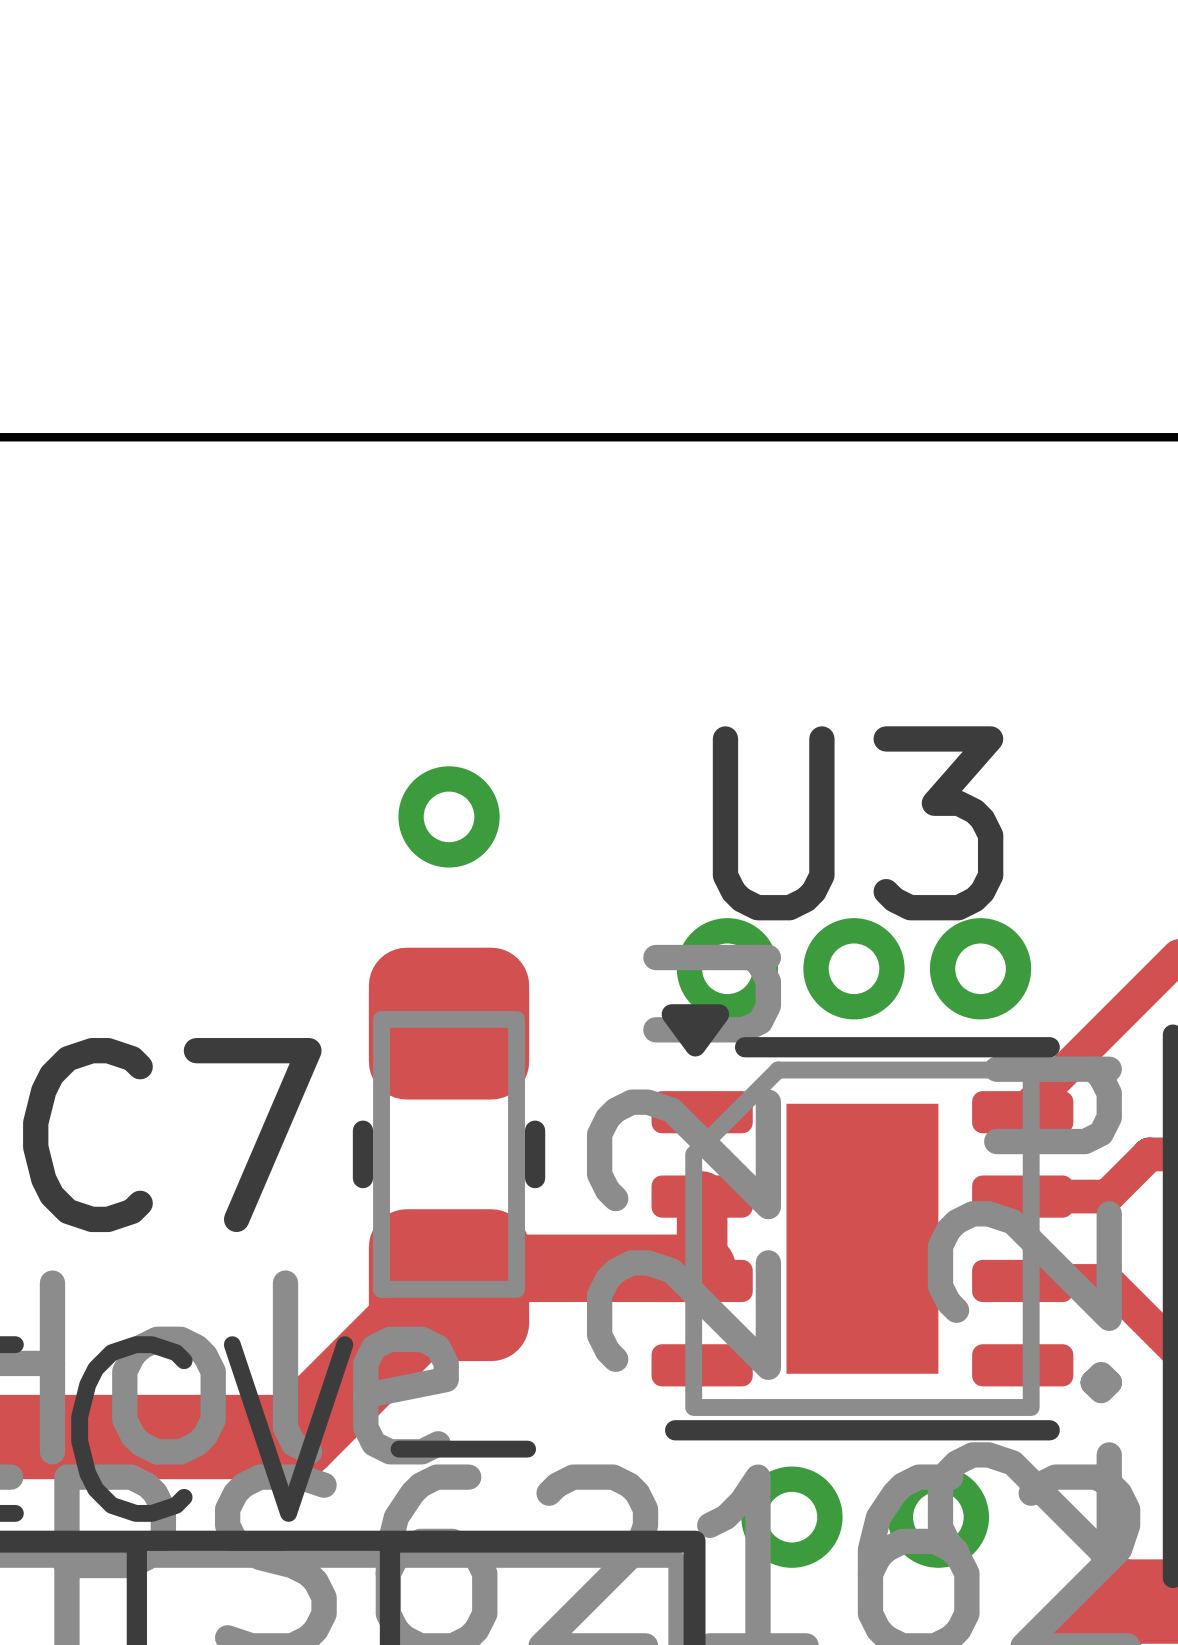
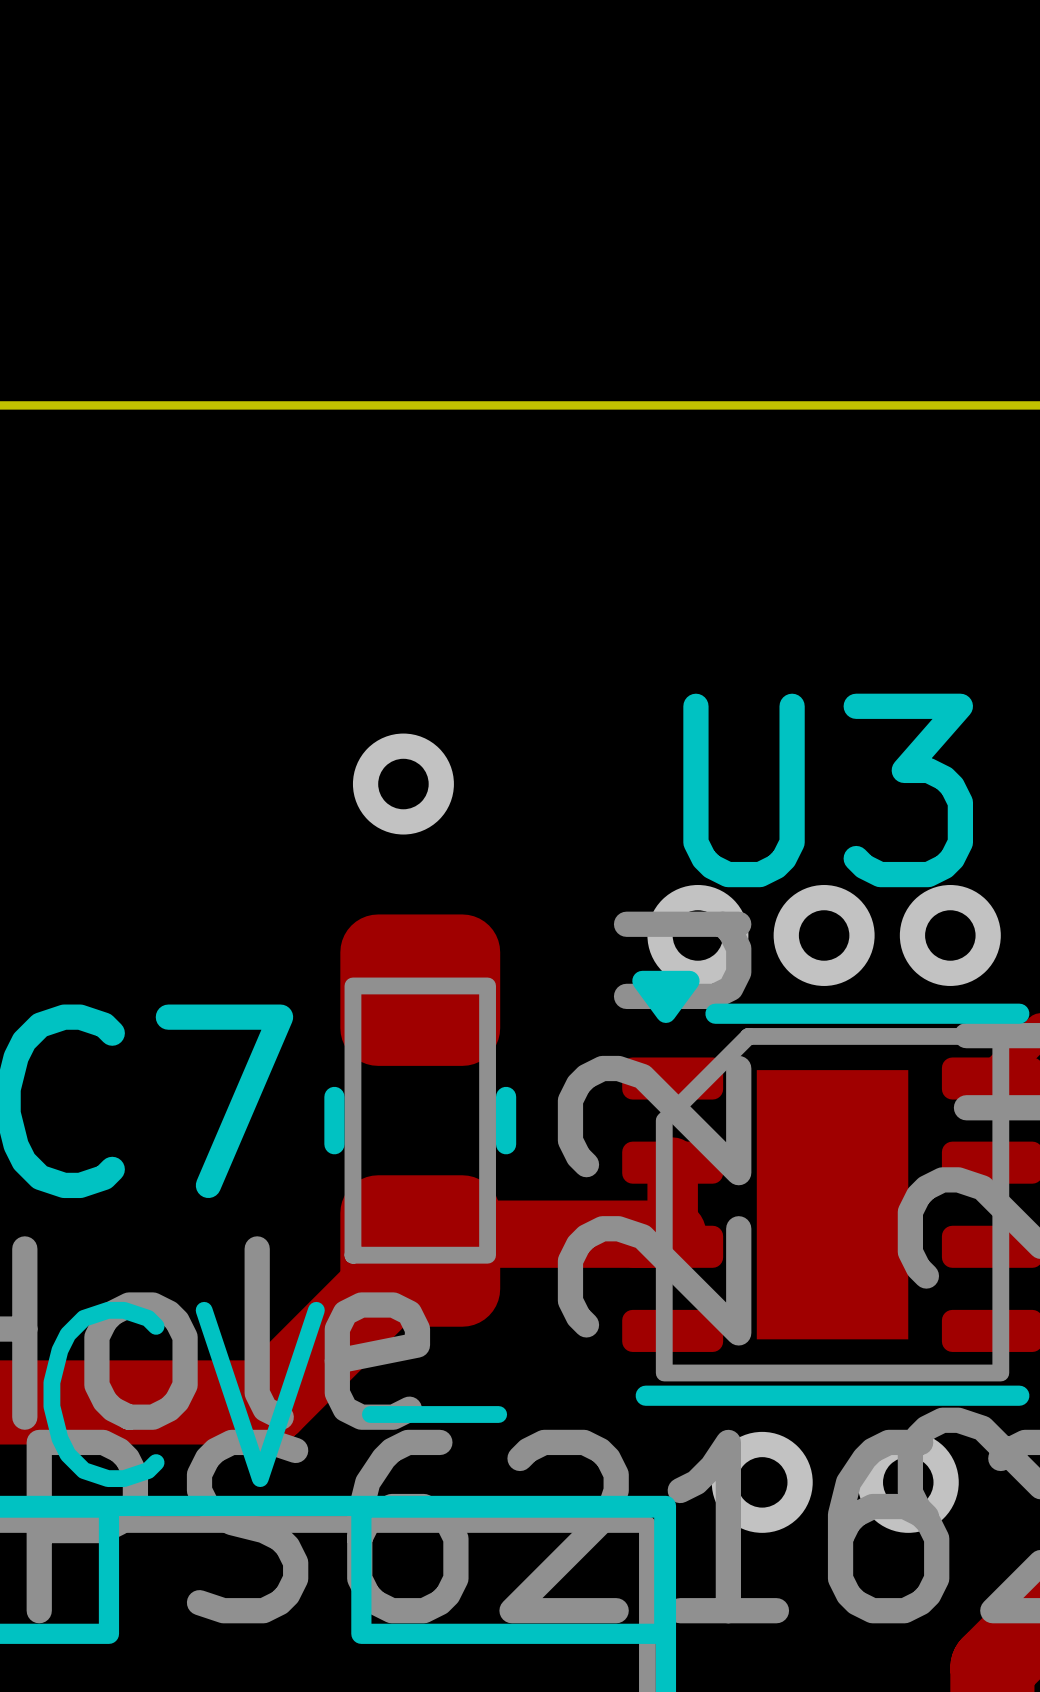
via position: (449, 816) -> (403, 784)

